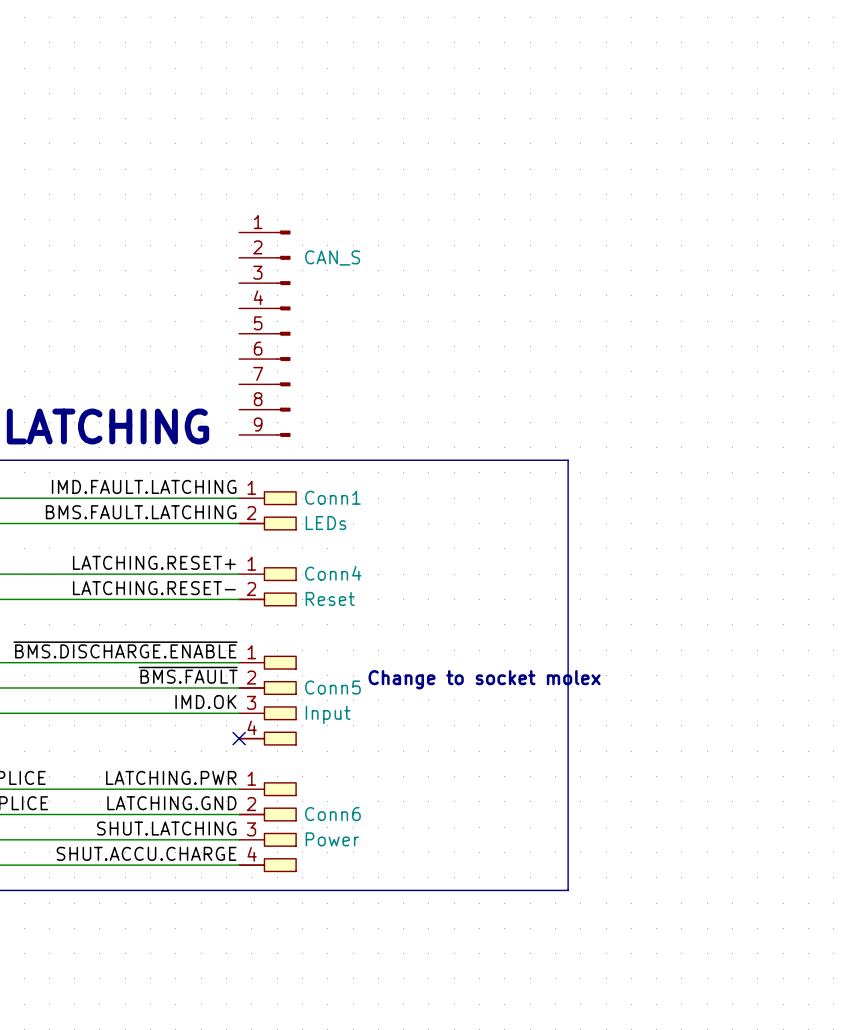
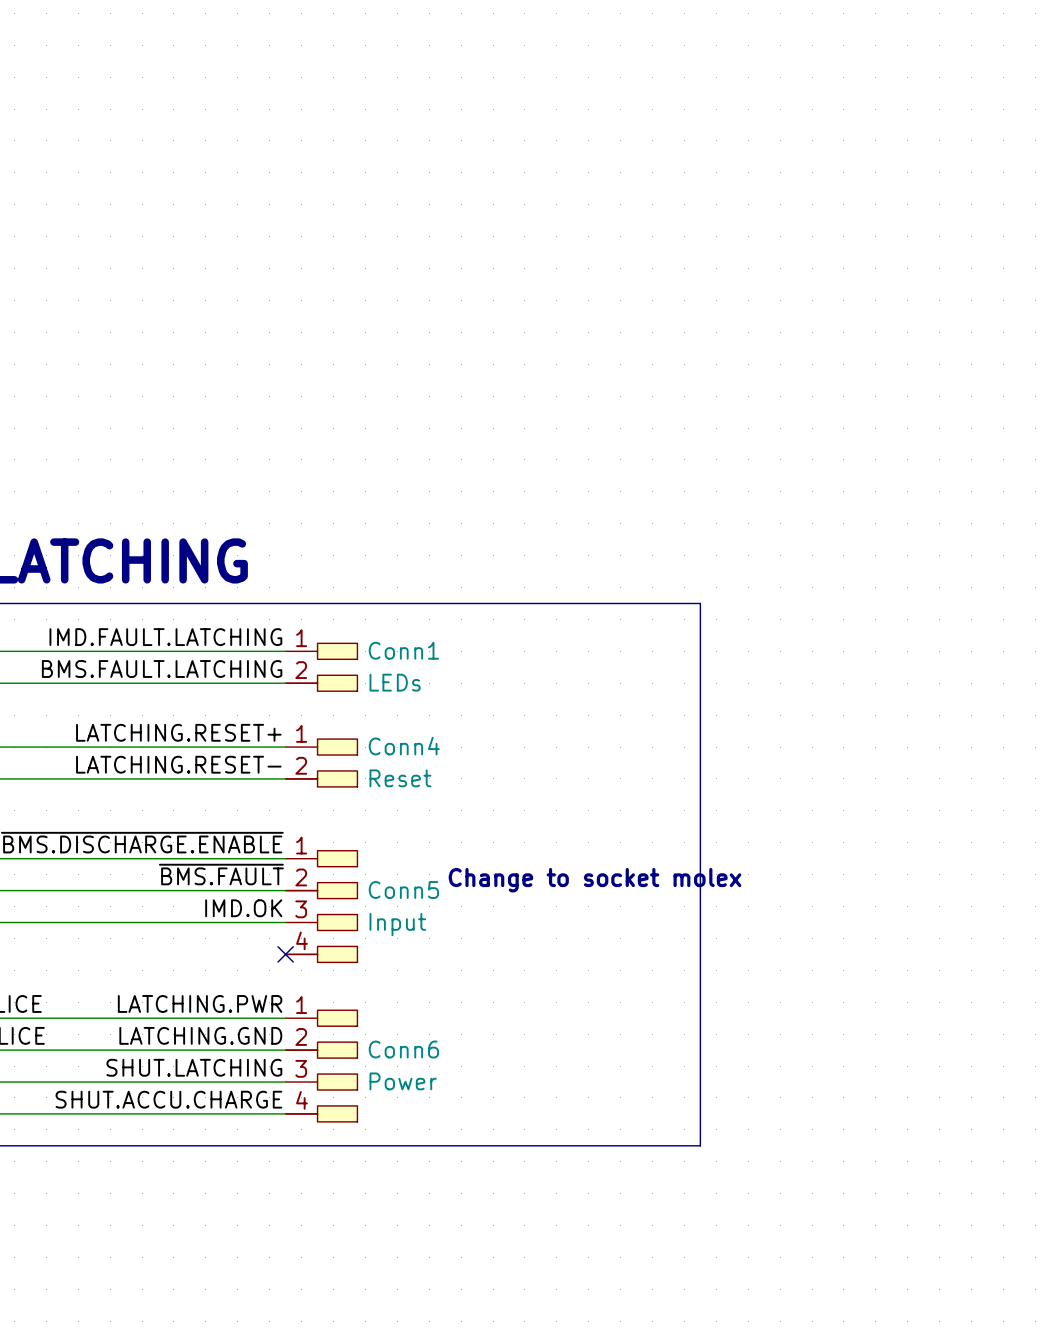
part: CAN_S (264, 333) -> none

